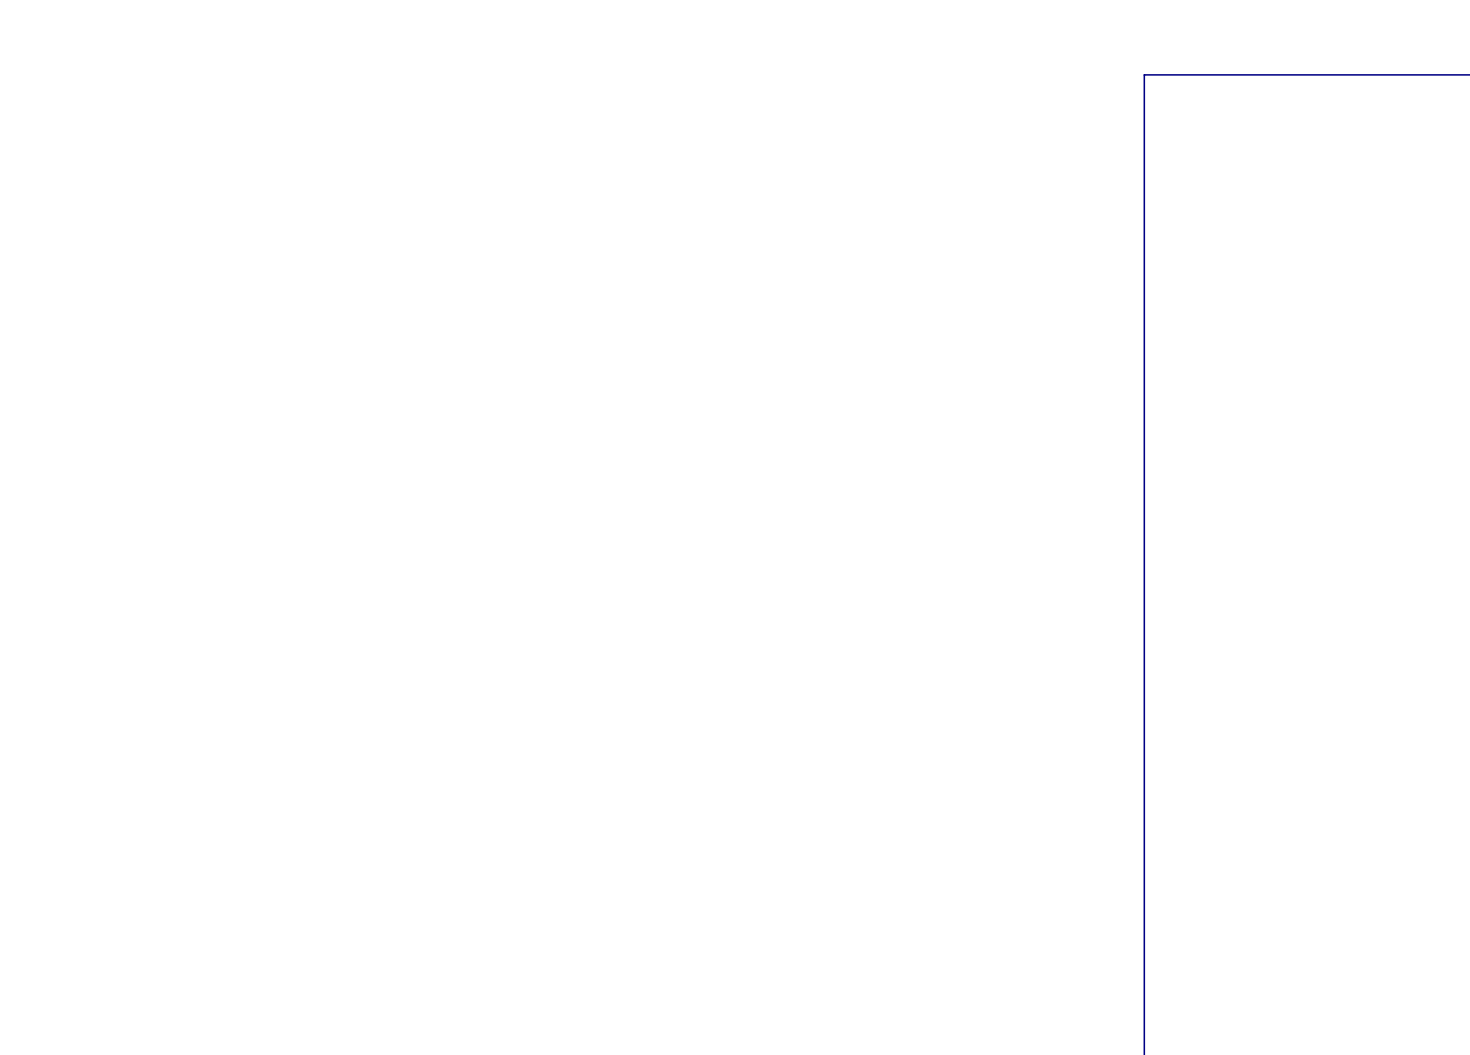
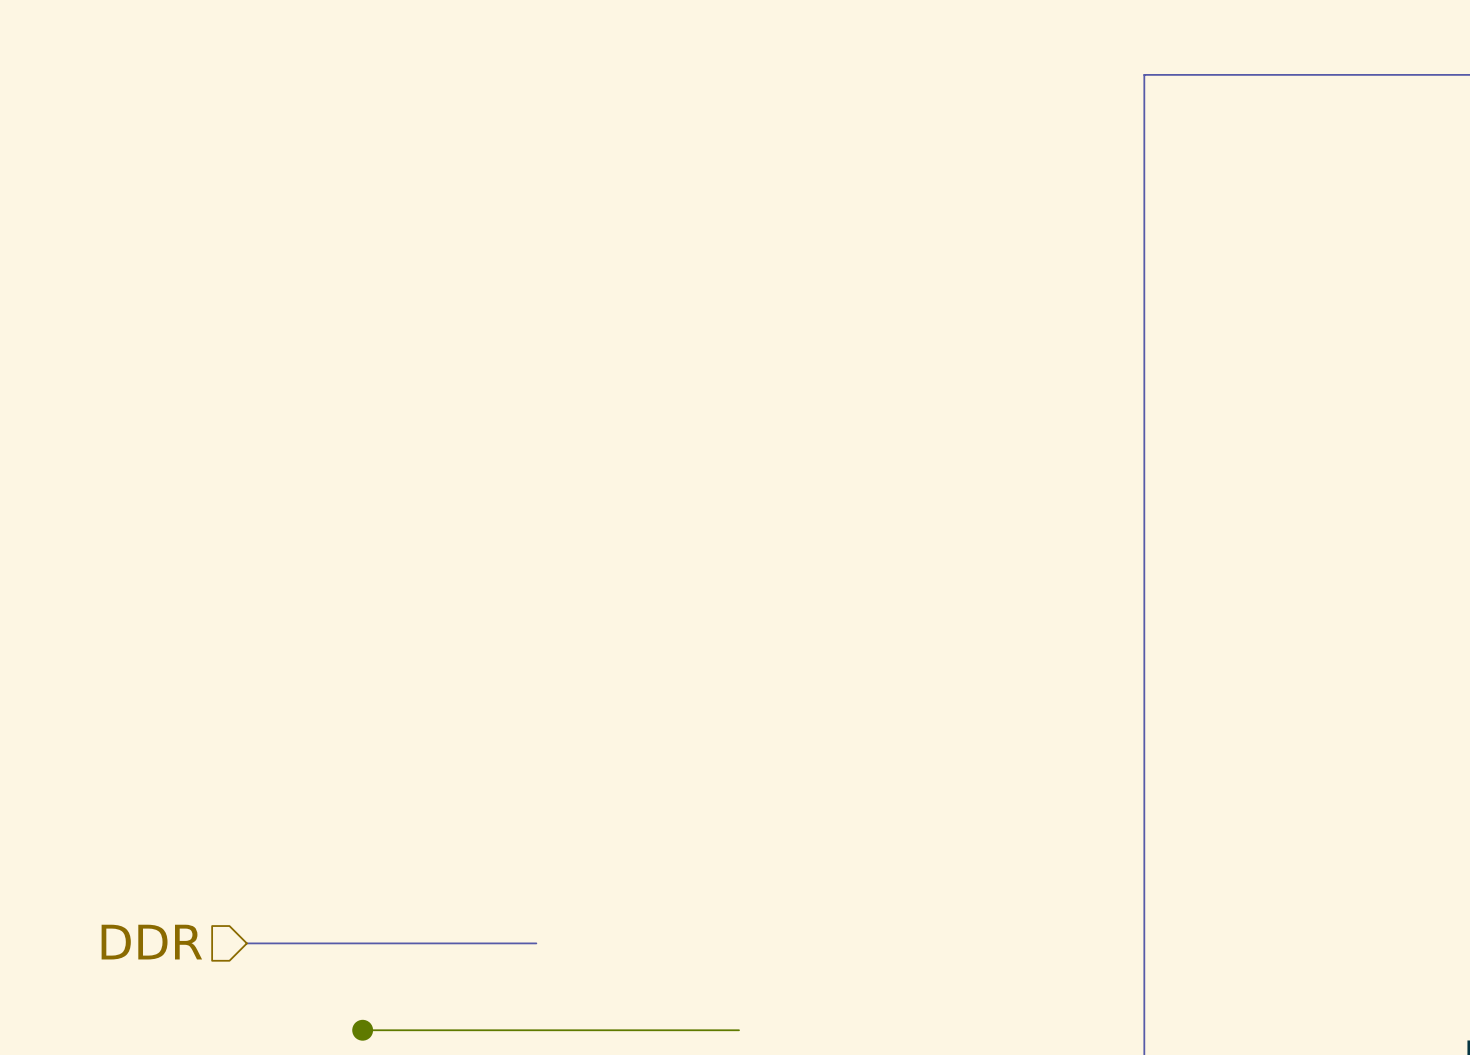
hierarchical label: none -> DDR (151, 942)
bus: none -> (246, 943) (536, 943)
wire: none -> (362, 1030) (739, 1030)
junction: none -> (362, 1030)

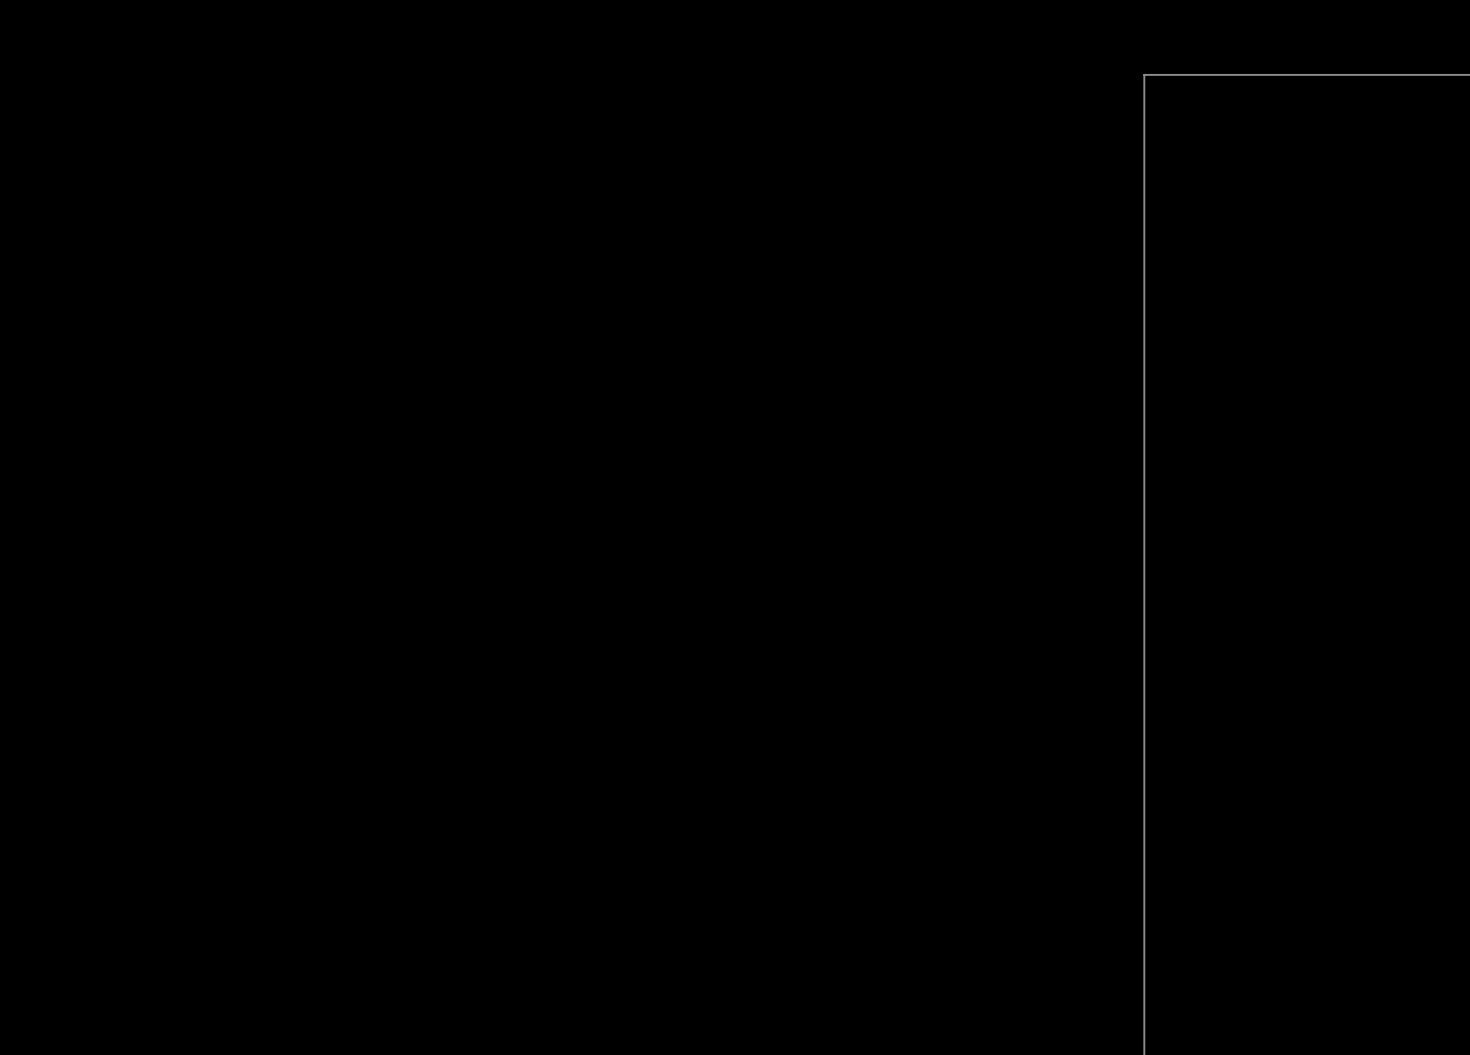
hierarchical label: DDR (151, 942) -> none
bus: (246, 943) (536, 943) -> none
wire: (362, 1030) (739, 1030) -> none
junction: (362, 1030) -> none

